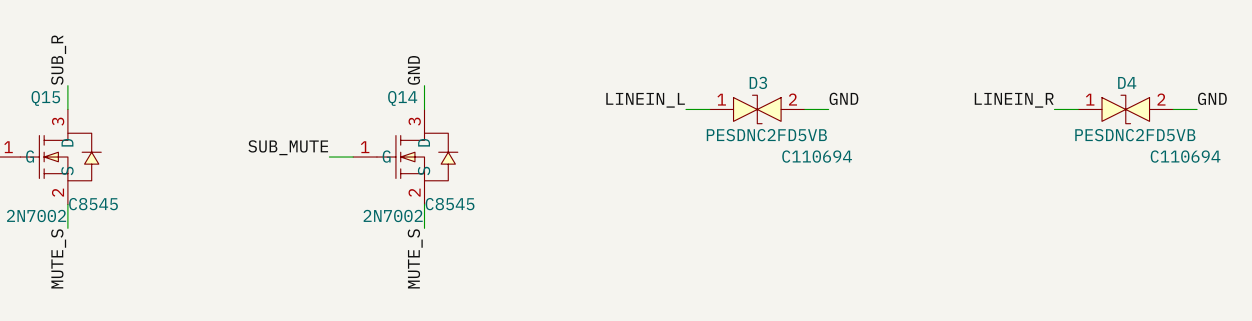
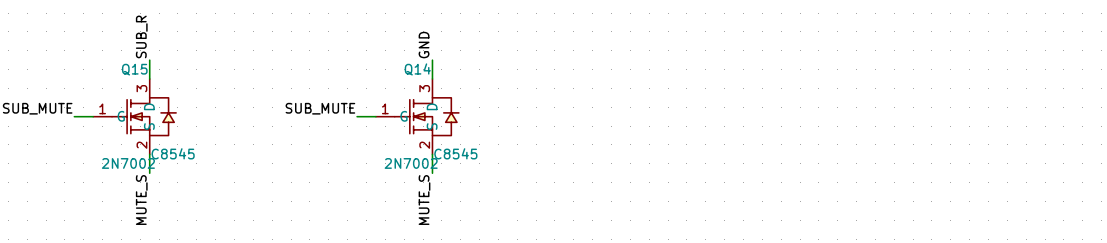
label: GND (843, 98) -> none
label: GND (1212, 98) -> none
label: LINEIN_L (645, 100) -> none
label: LINEIN_R (1014, 100) -> none
wire: (685, 109) (709, 109) -> none
D3: PESDNC2FD5VB (757, 109) -> none
wire: (804, 109) (828, 109) -> none
wire: (1054, 109) (1078, 109) -> none
D4: PESDNC2FD5VB (1125, 109) -> none
wire: (1173, 109) (1197, 109) -> none

